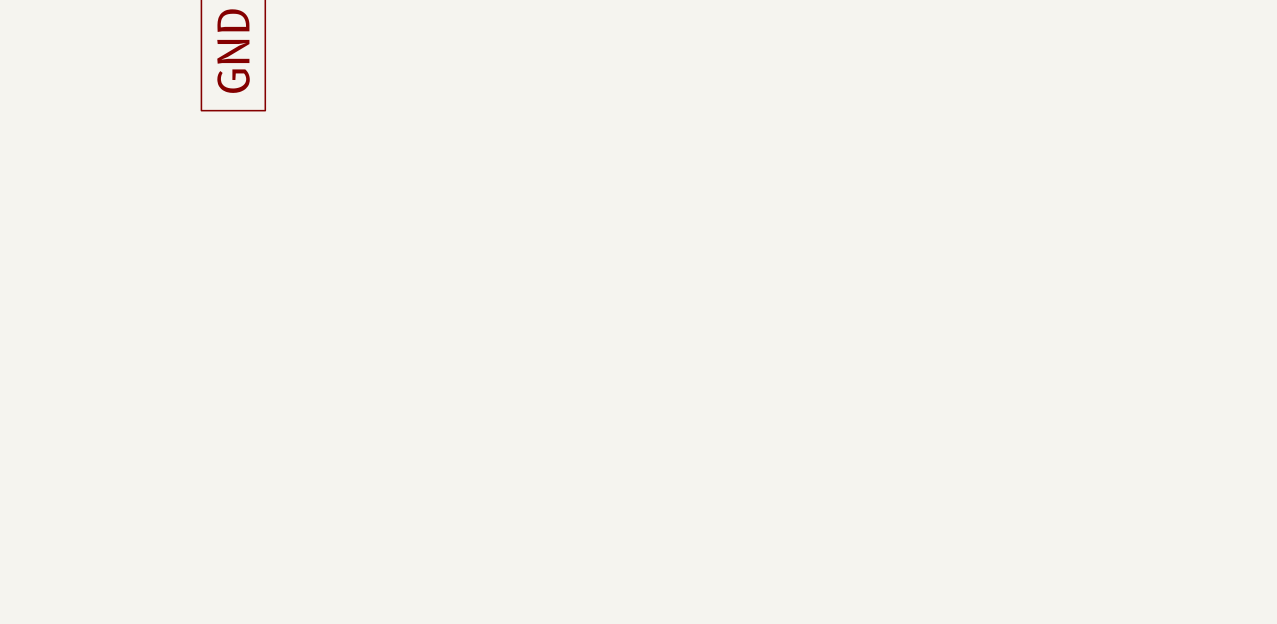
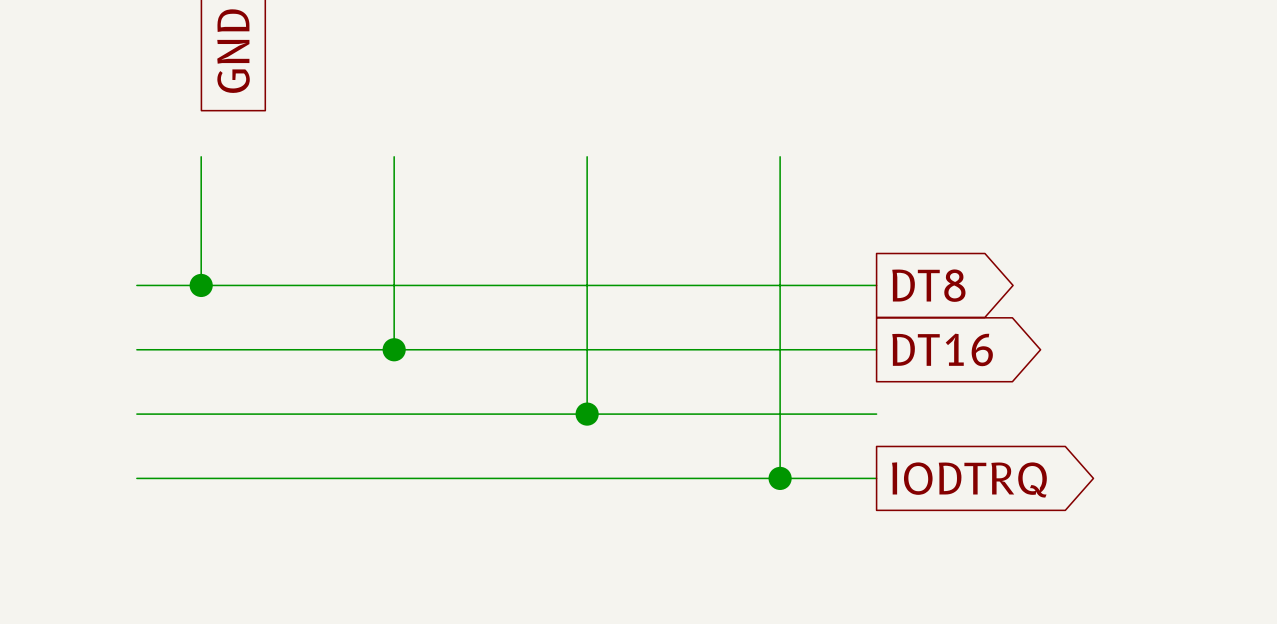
wire: none -> (201, 156) (201, 285)
wire: none -> (394, 156) (394, 349)
wire: none -> (587, 156) (587, 414)
wire: none -> (780, 156) (780, 478)
wire: none -> (136, 285) (876, 285)
junction: none -> (201, 285)
global label: none -> DT8 (928, 285)
wire: none -> (136, 349) (876, 349)
junction: none -> (394, 349)
global label: none -> DT16 (942, 349)
wire: none -> (136, 414) (876, 414)
junction: none -> (587, 414)
wire: none -> (136, 478) (876, 478)
junction: none -> (780, 478)
global label: none -> IODTRQ (969, 479)

